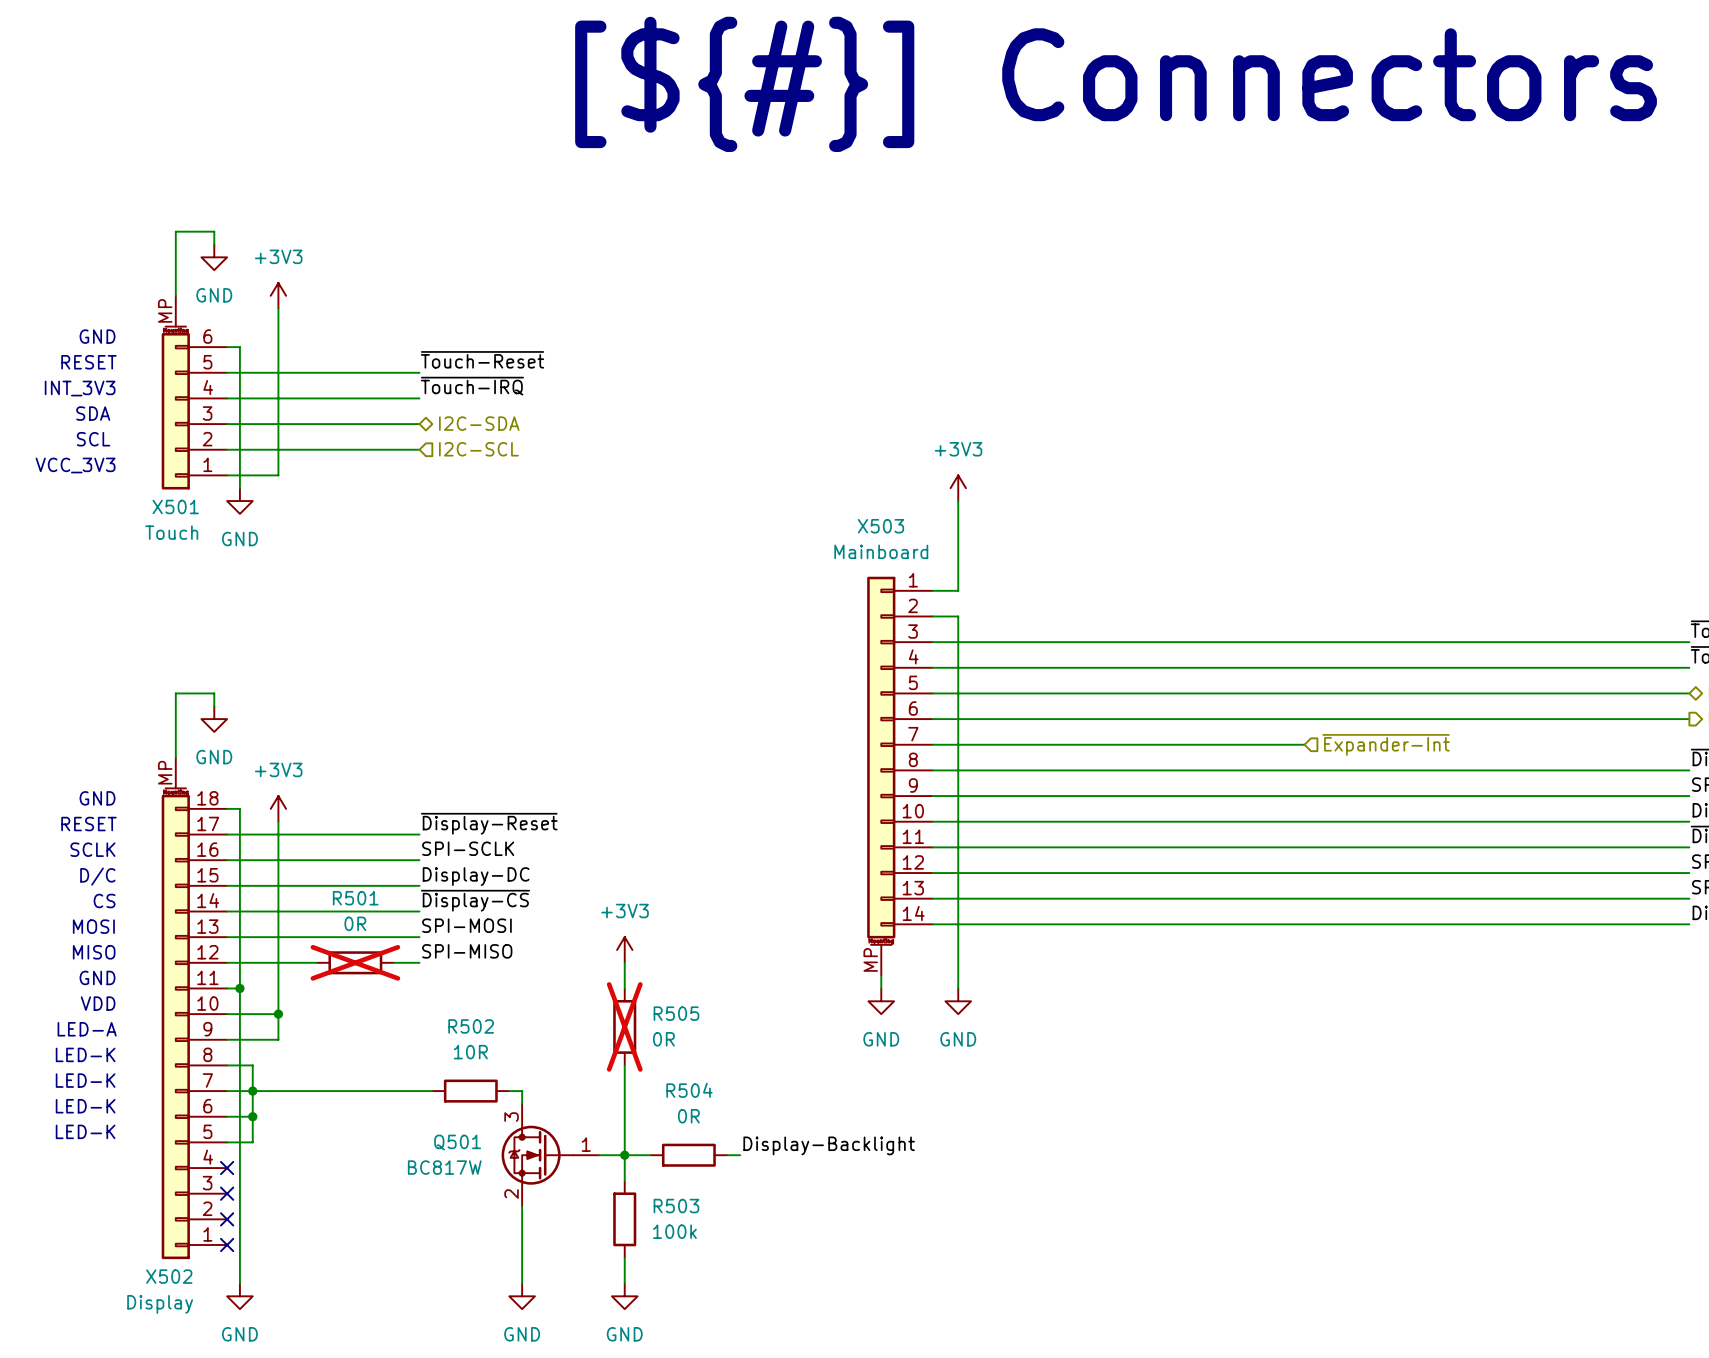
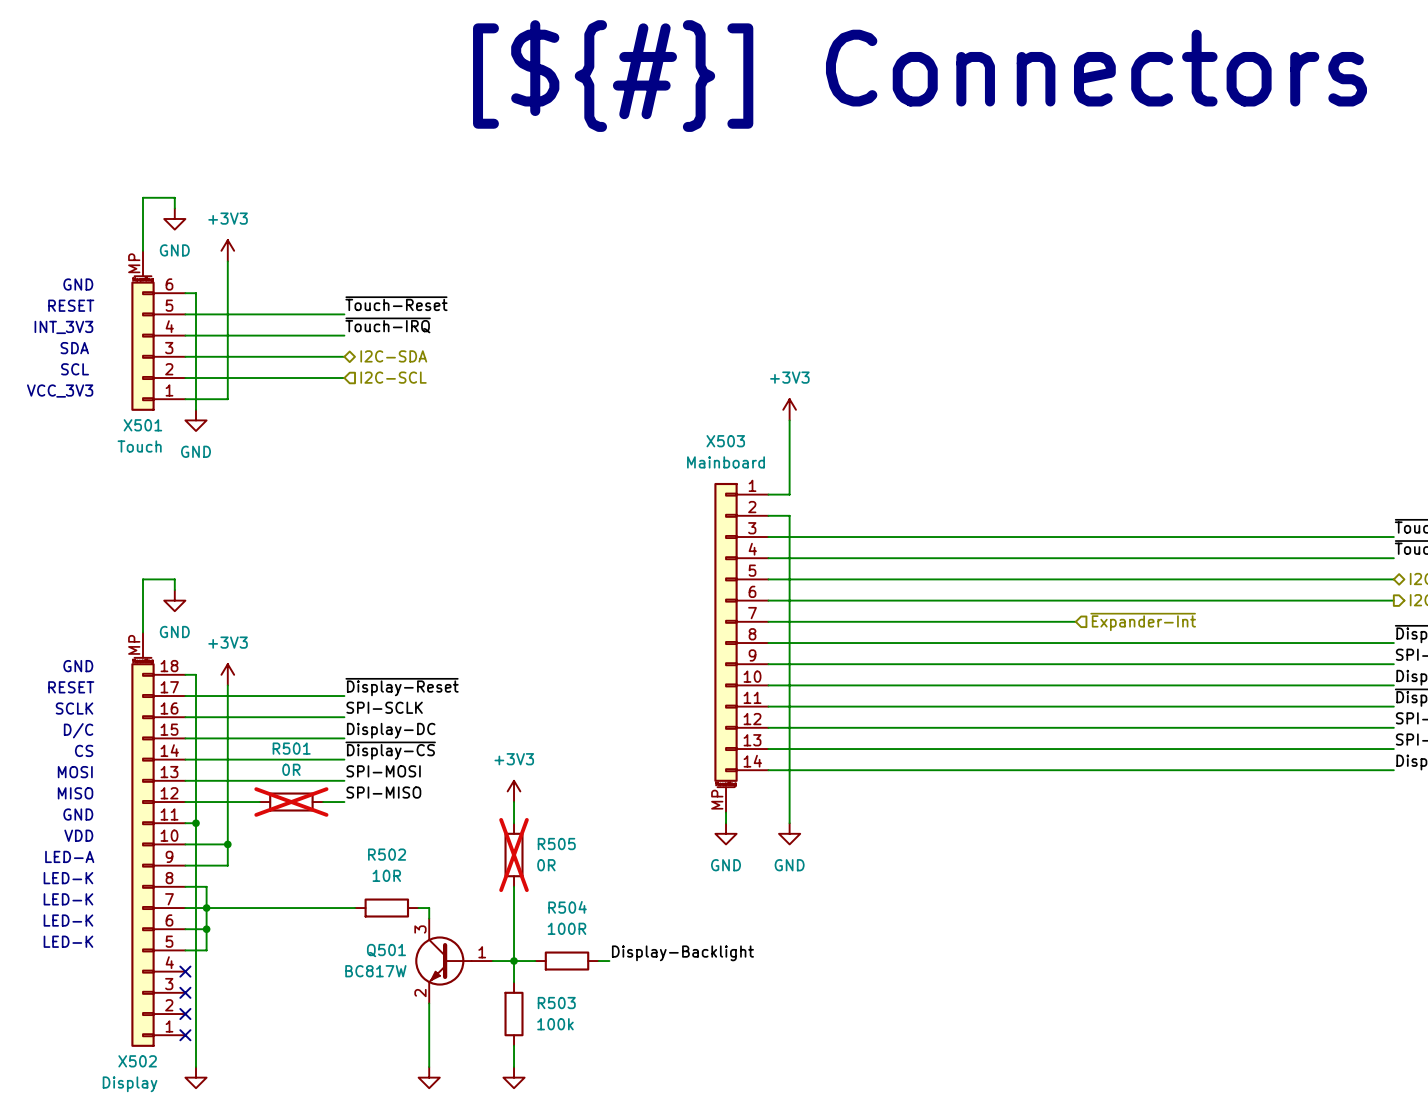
Q501 symbol: [501, 1103, 600, 1207] -> [415, 918, 493, 1004]
R504 value: 0R (688, 1116) -> 100R (567, 928)

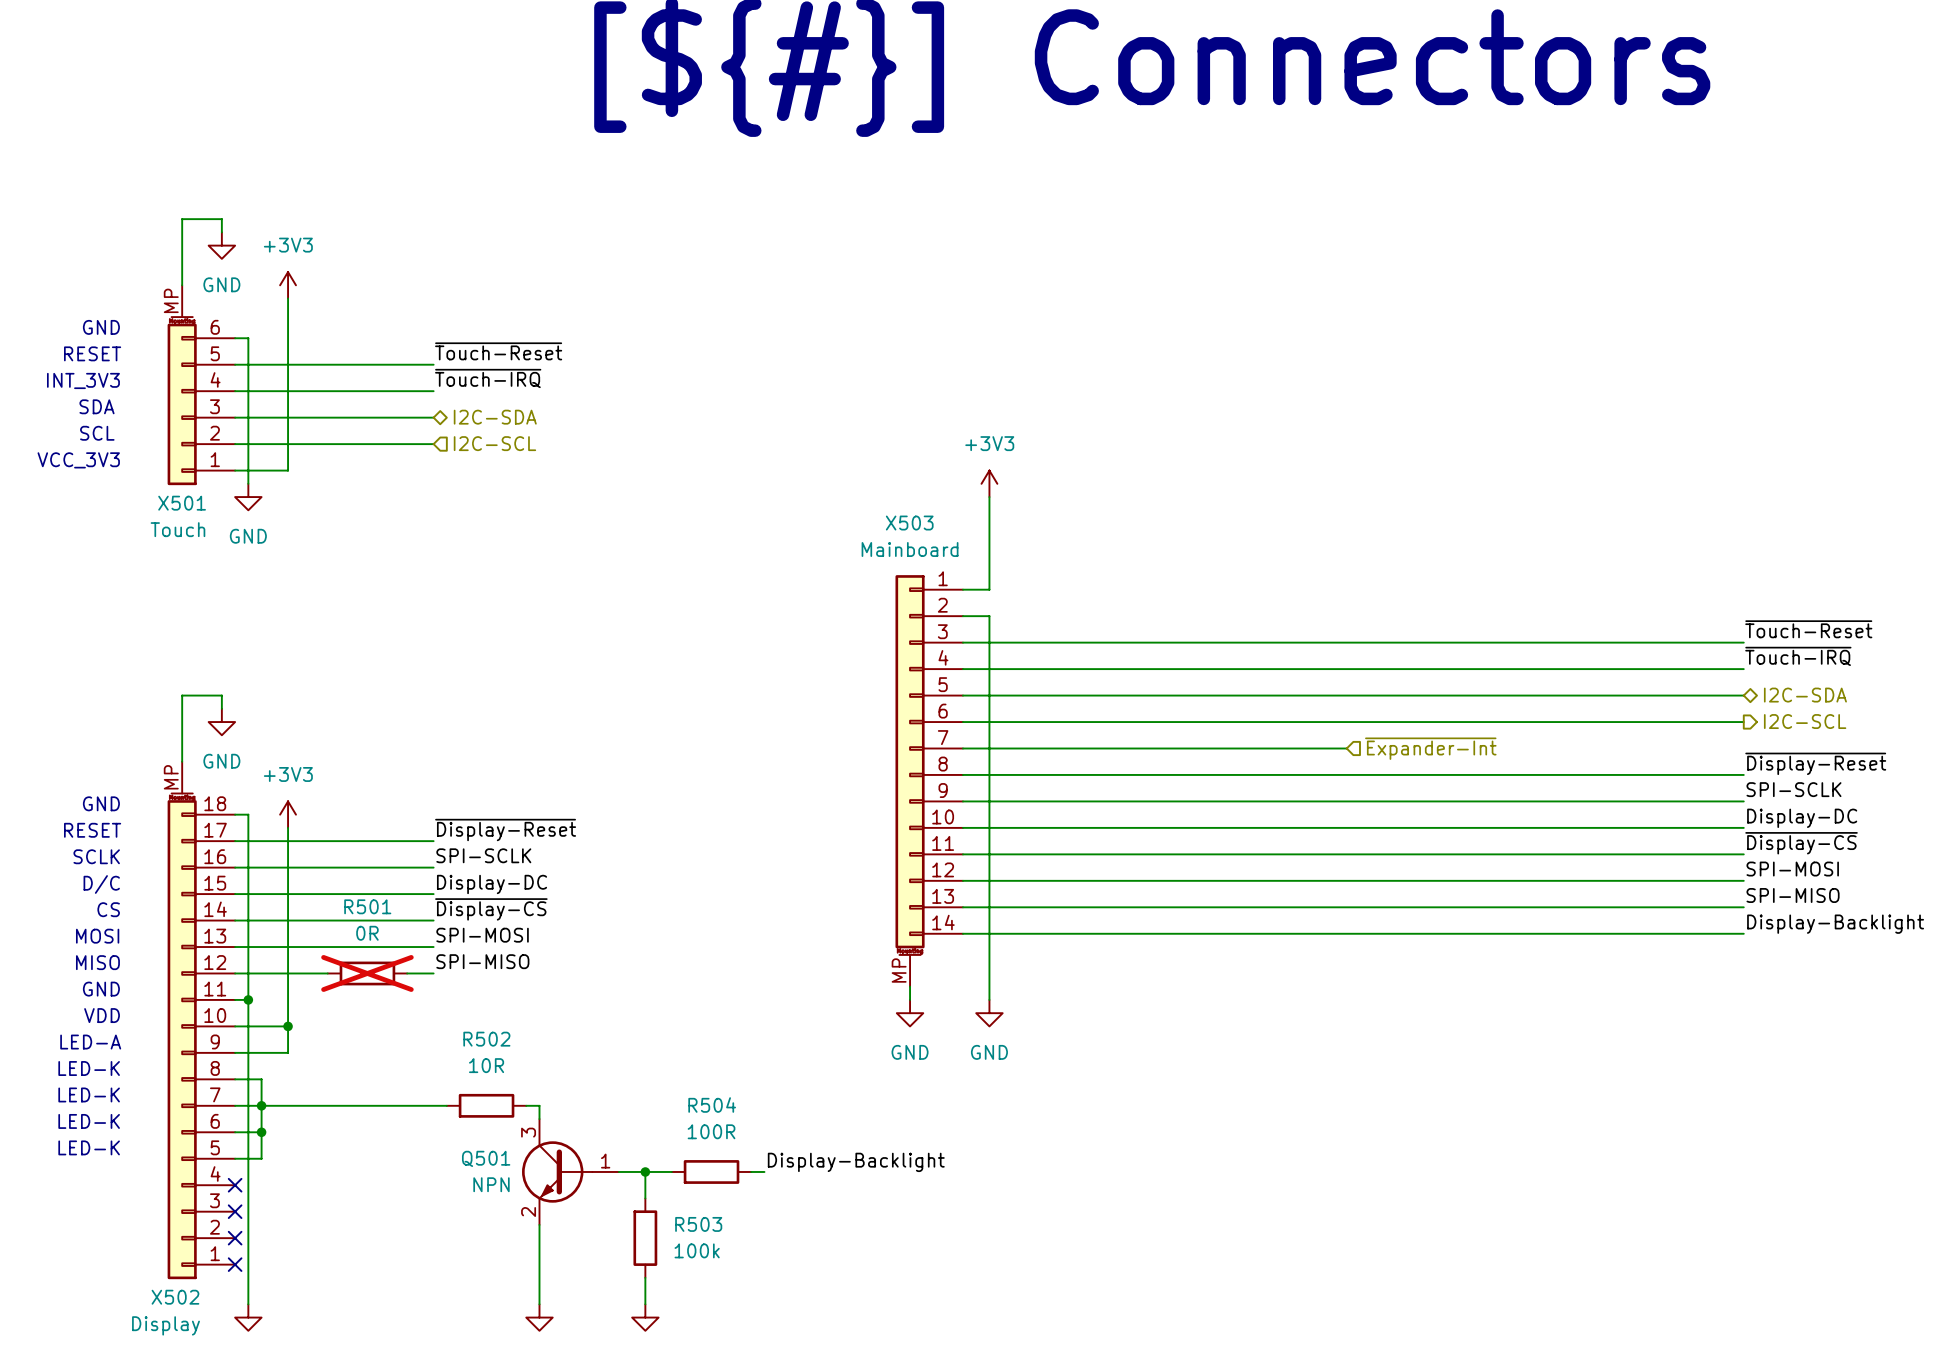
power symbol: +3V3 (514, 791) -> none
wire: (514, 802) (514, 823) -> none
R505: 0R (514, 855) -> none
wire: (514, 886) (514, 961) -> none
Q501 value: BC817W (375, 971) -> NPN (491, 1184)

